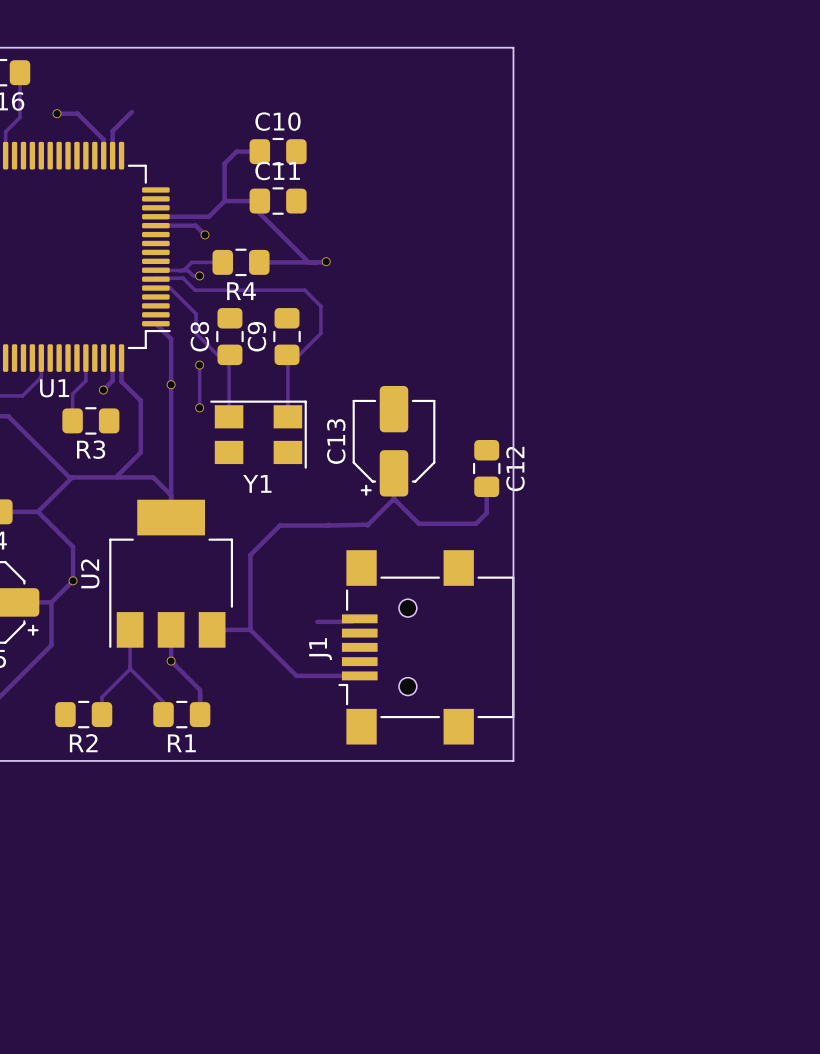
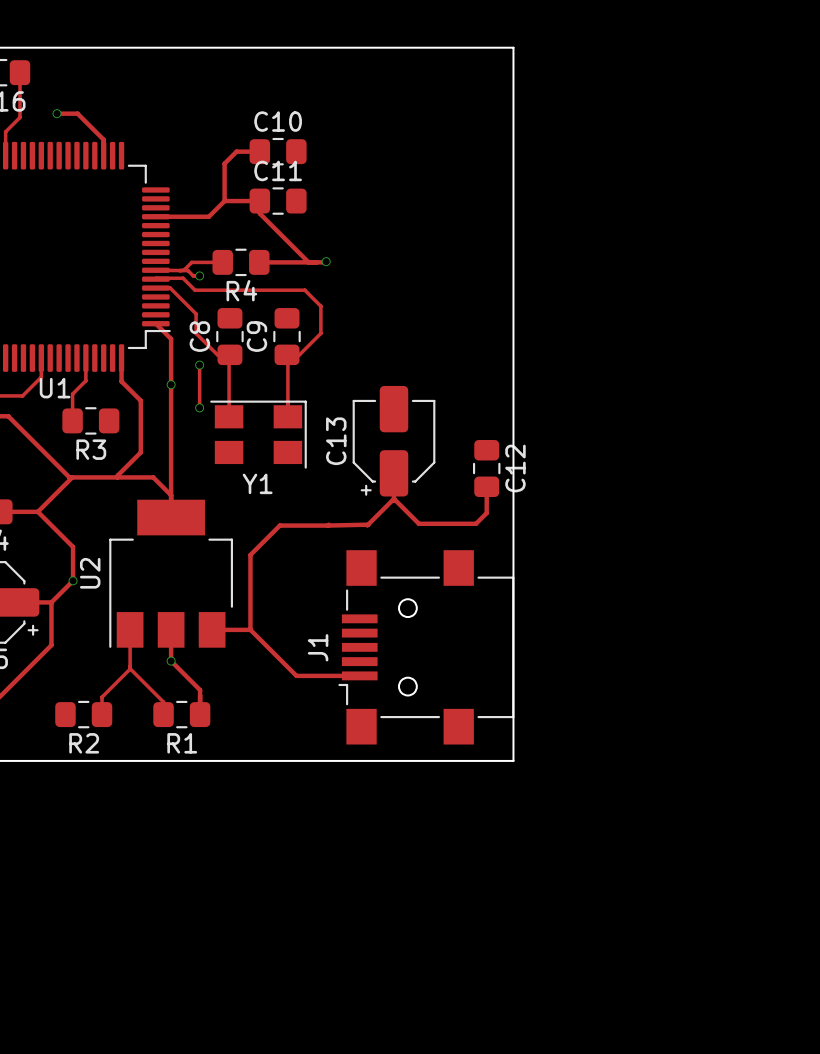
track: (131, 111) (112, 131) (112, 155) -> none
track: (155, 225) (195, 225) (204, 234) -> none
via: (204, 234) -> none
track: (112, 358) (112, 380) (103, 390) -> none
via: (103, 390) -> none
track: (359, 618) (354, 618) (351, 621) (317, 621) -> none

